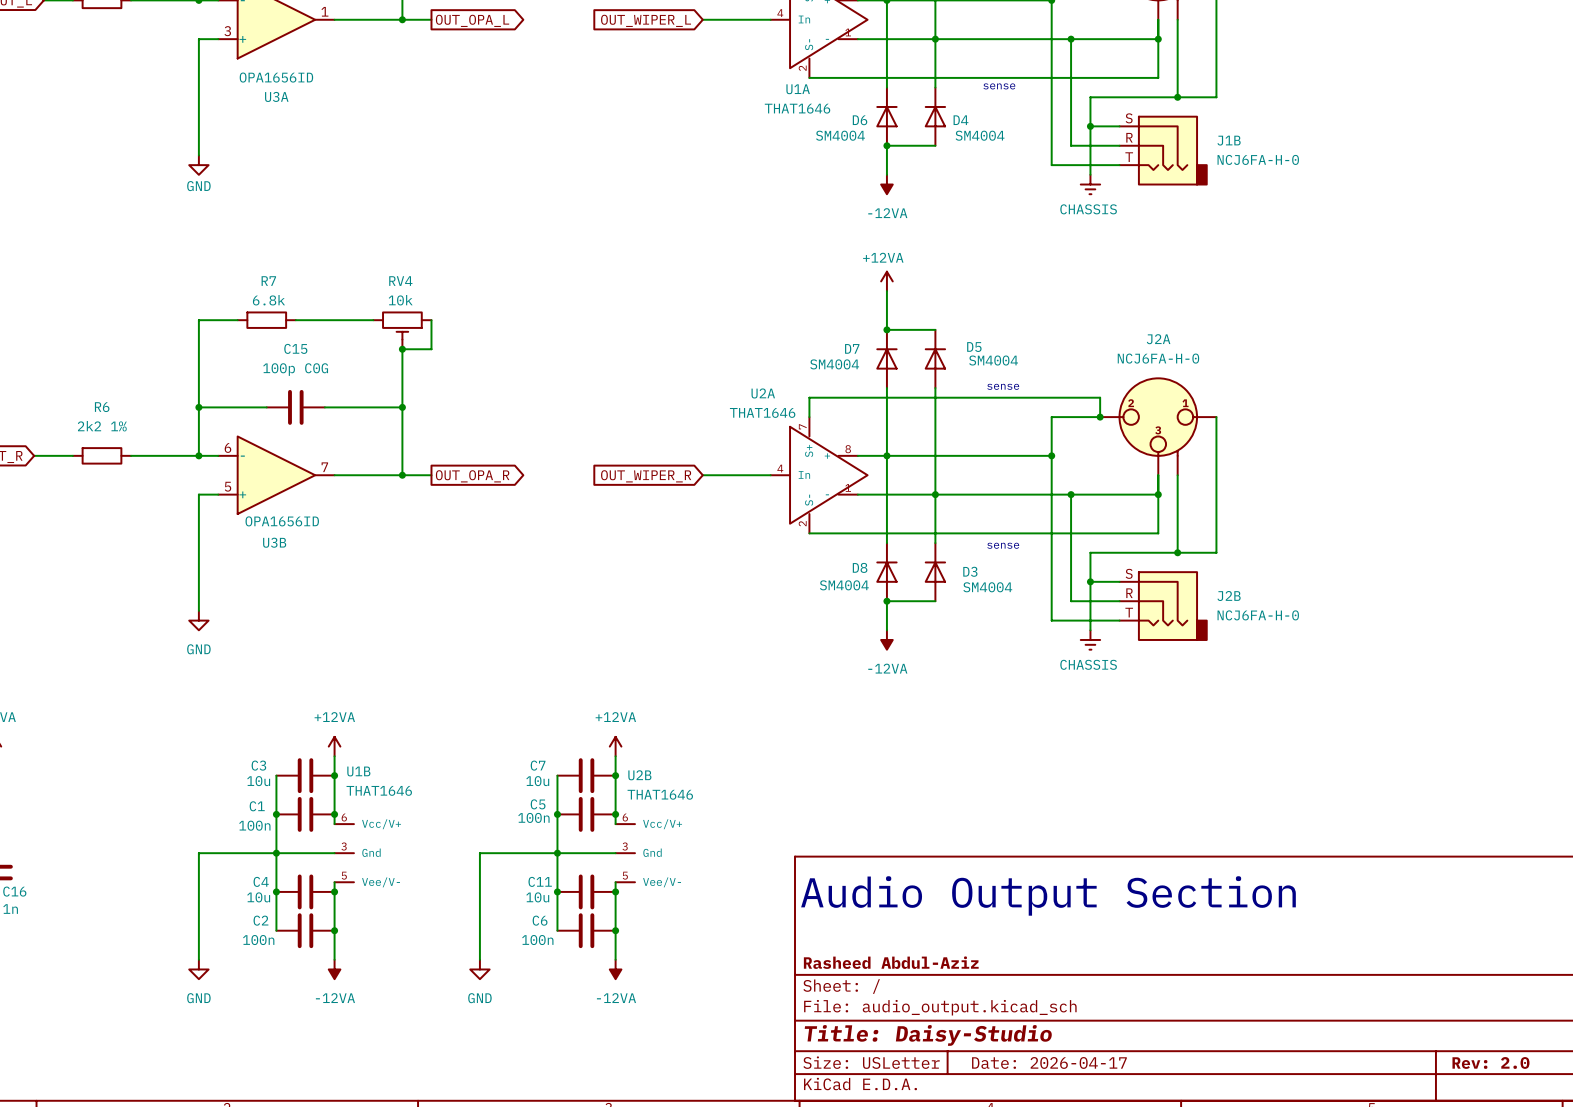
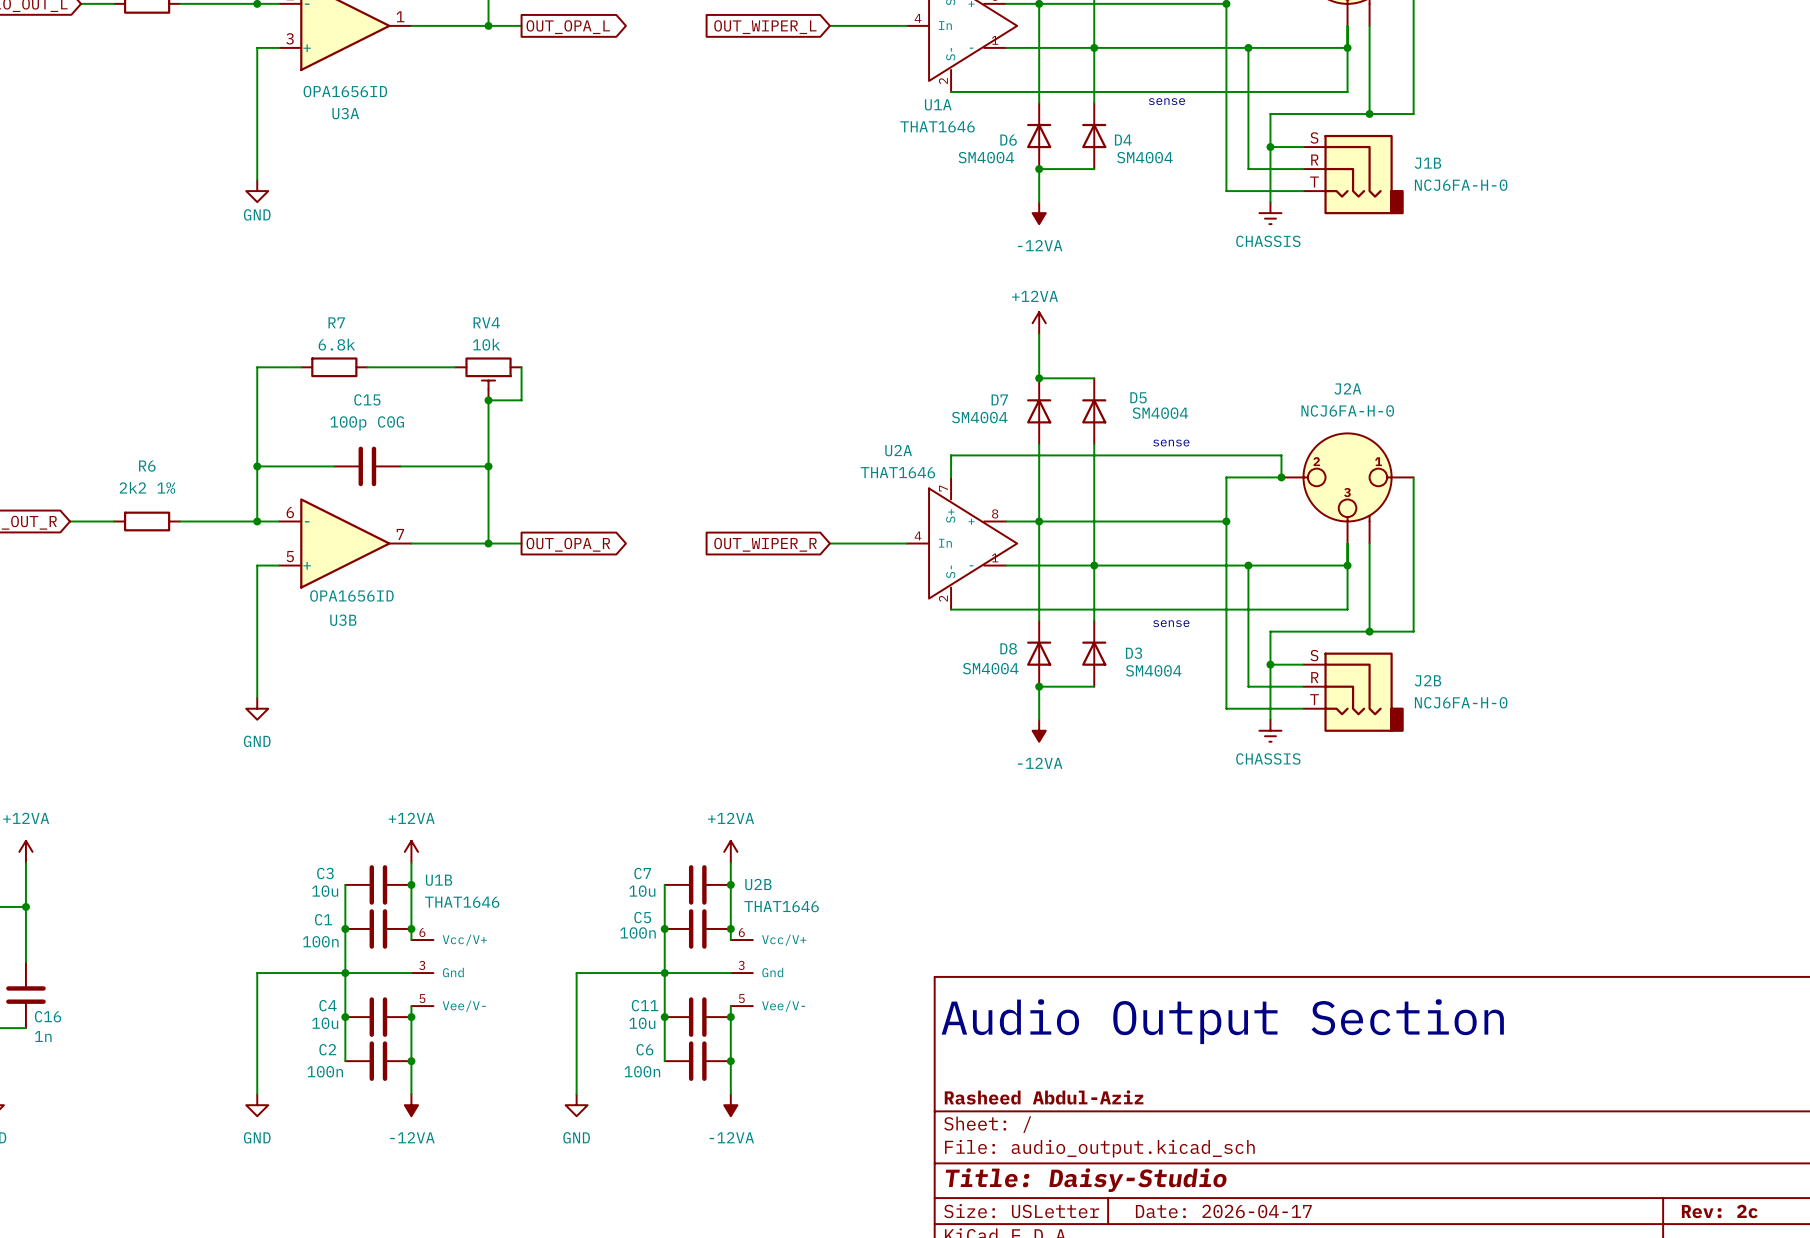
title block: Rev: 2.0 (1490, 1062) -> Rev: 2c (1719, 1211)

